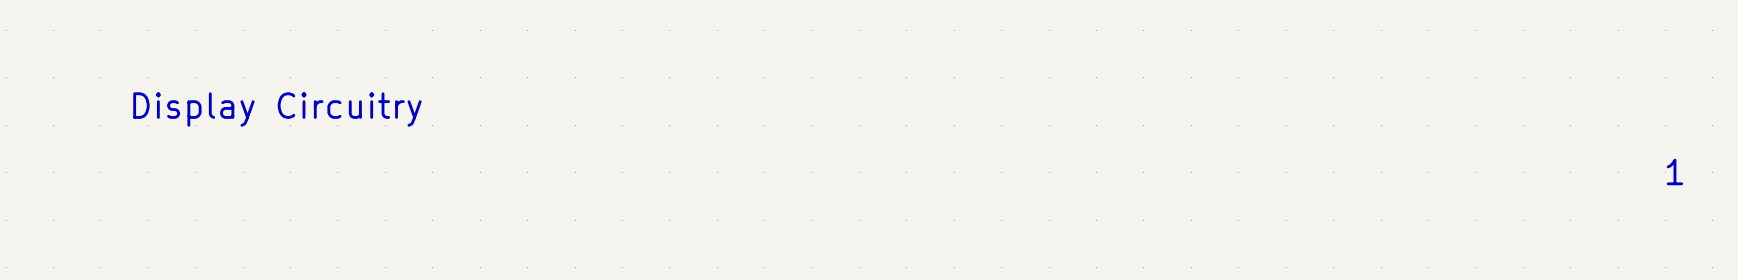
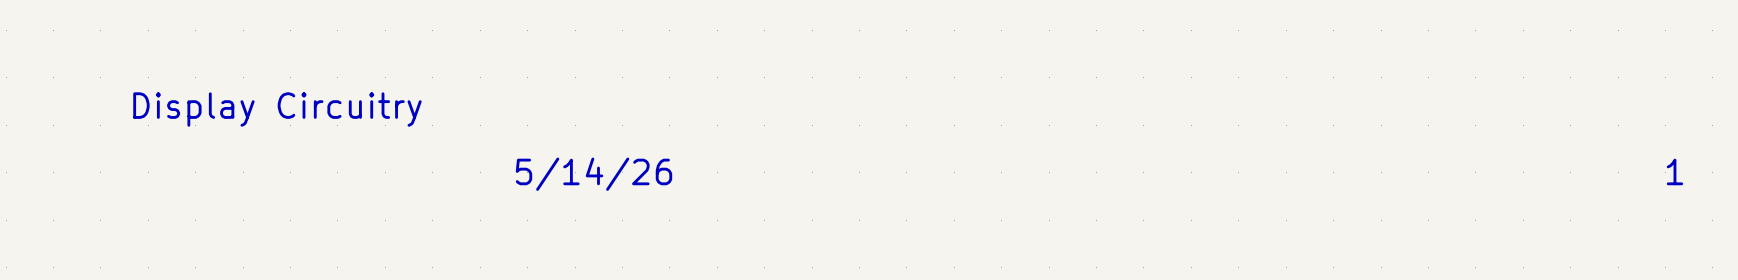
text: none -> 5/14/26 (593, 174)

